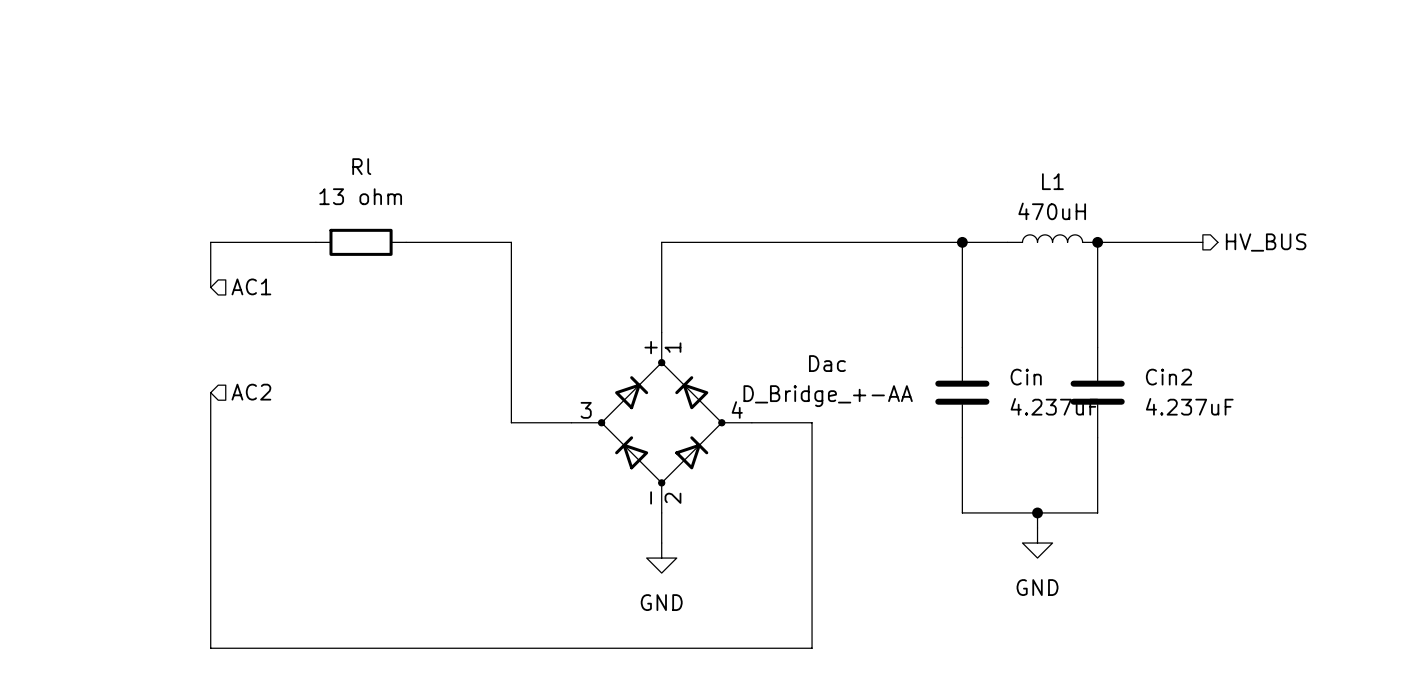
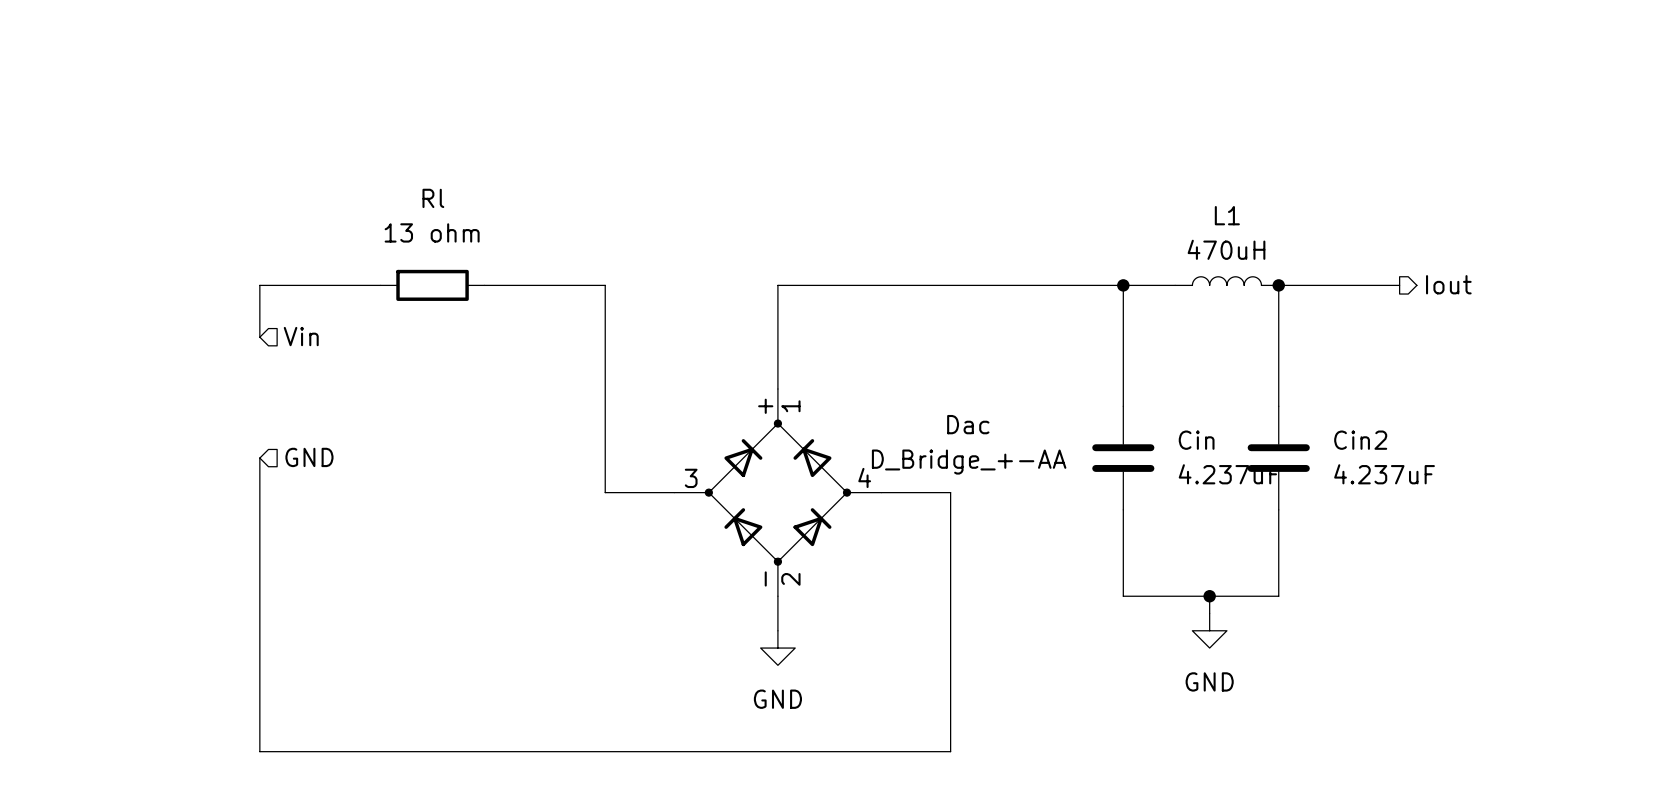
hierarchical label: HV_BUS (1266, 242) -> Iout (1448, 284)
hierarchical label: AC1 (251, 286) -> Vin (301, 336)
hierarchical label: AC2 (251, 392) -> GND (309, 457)

